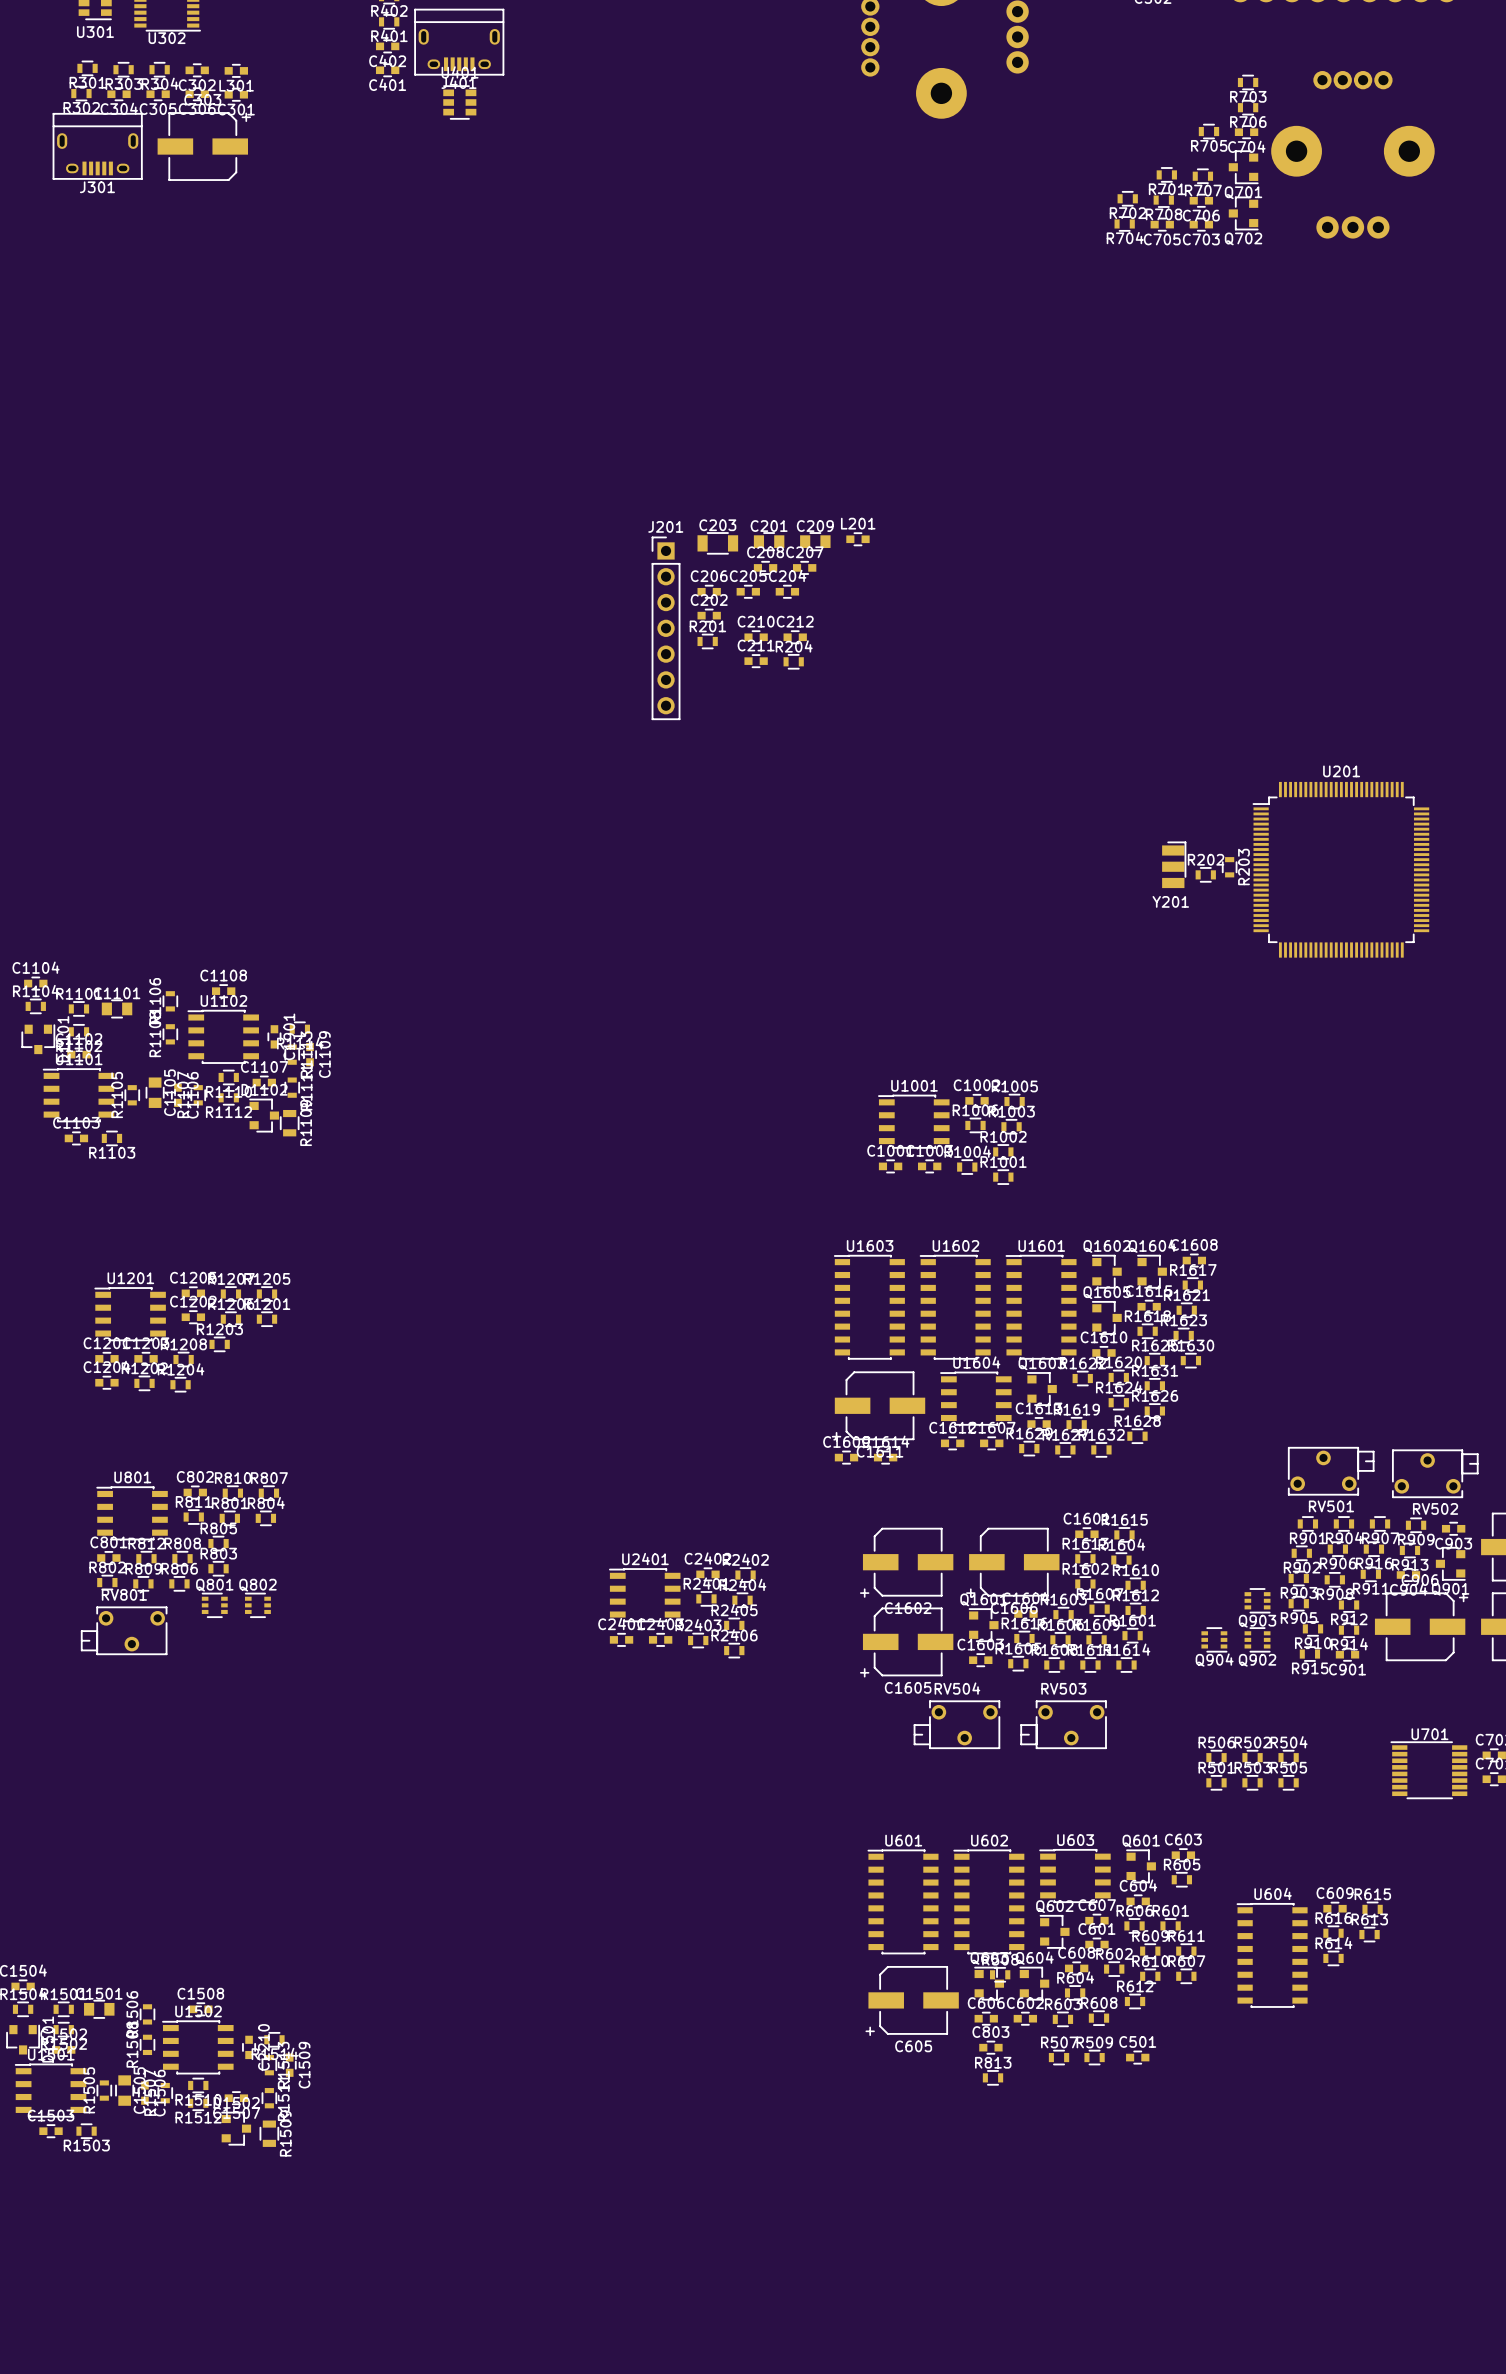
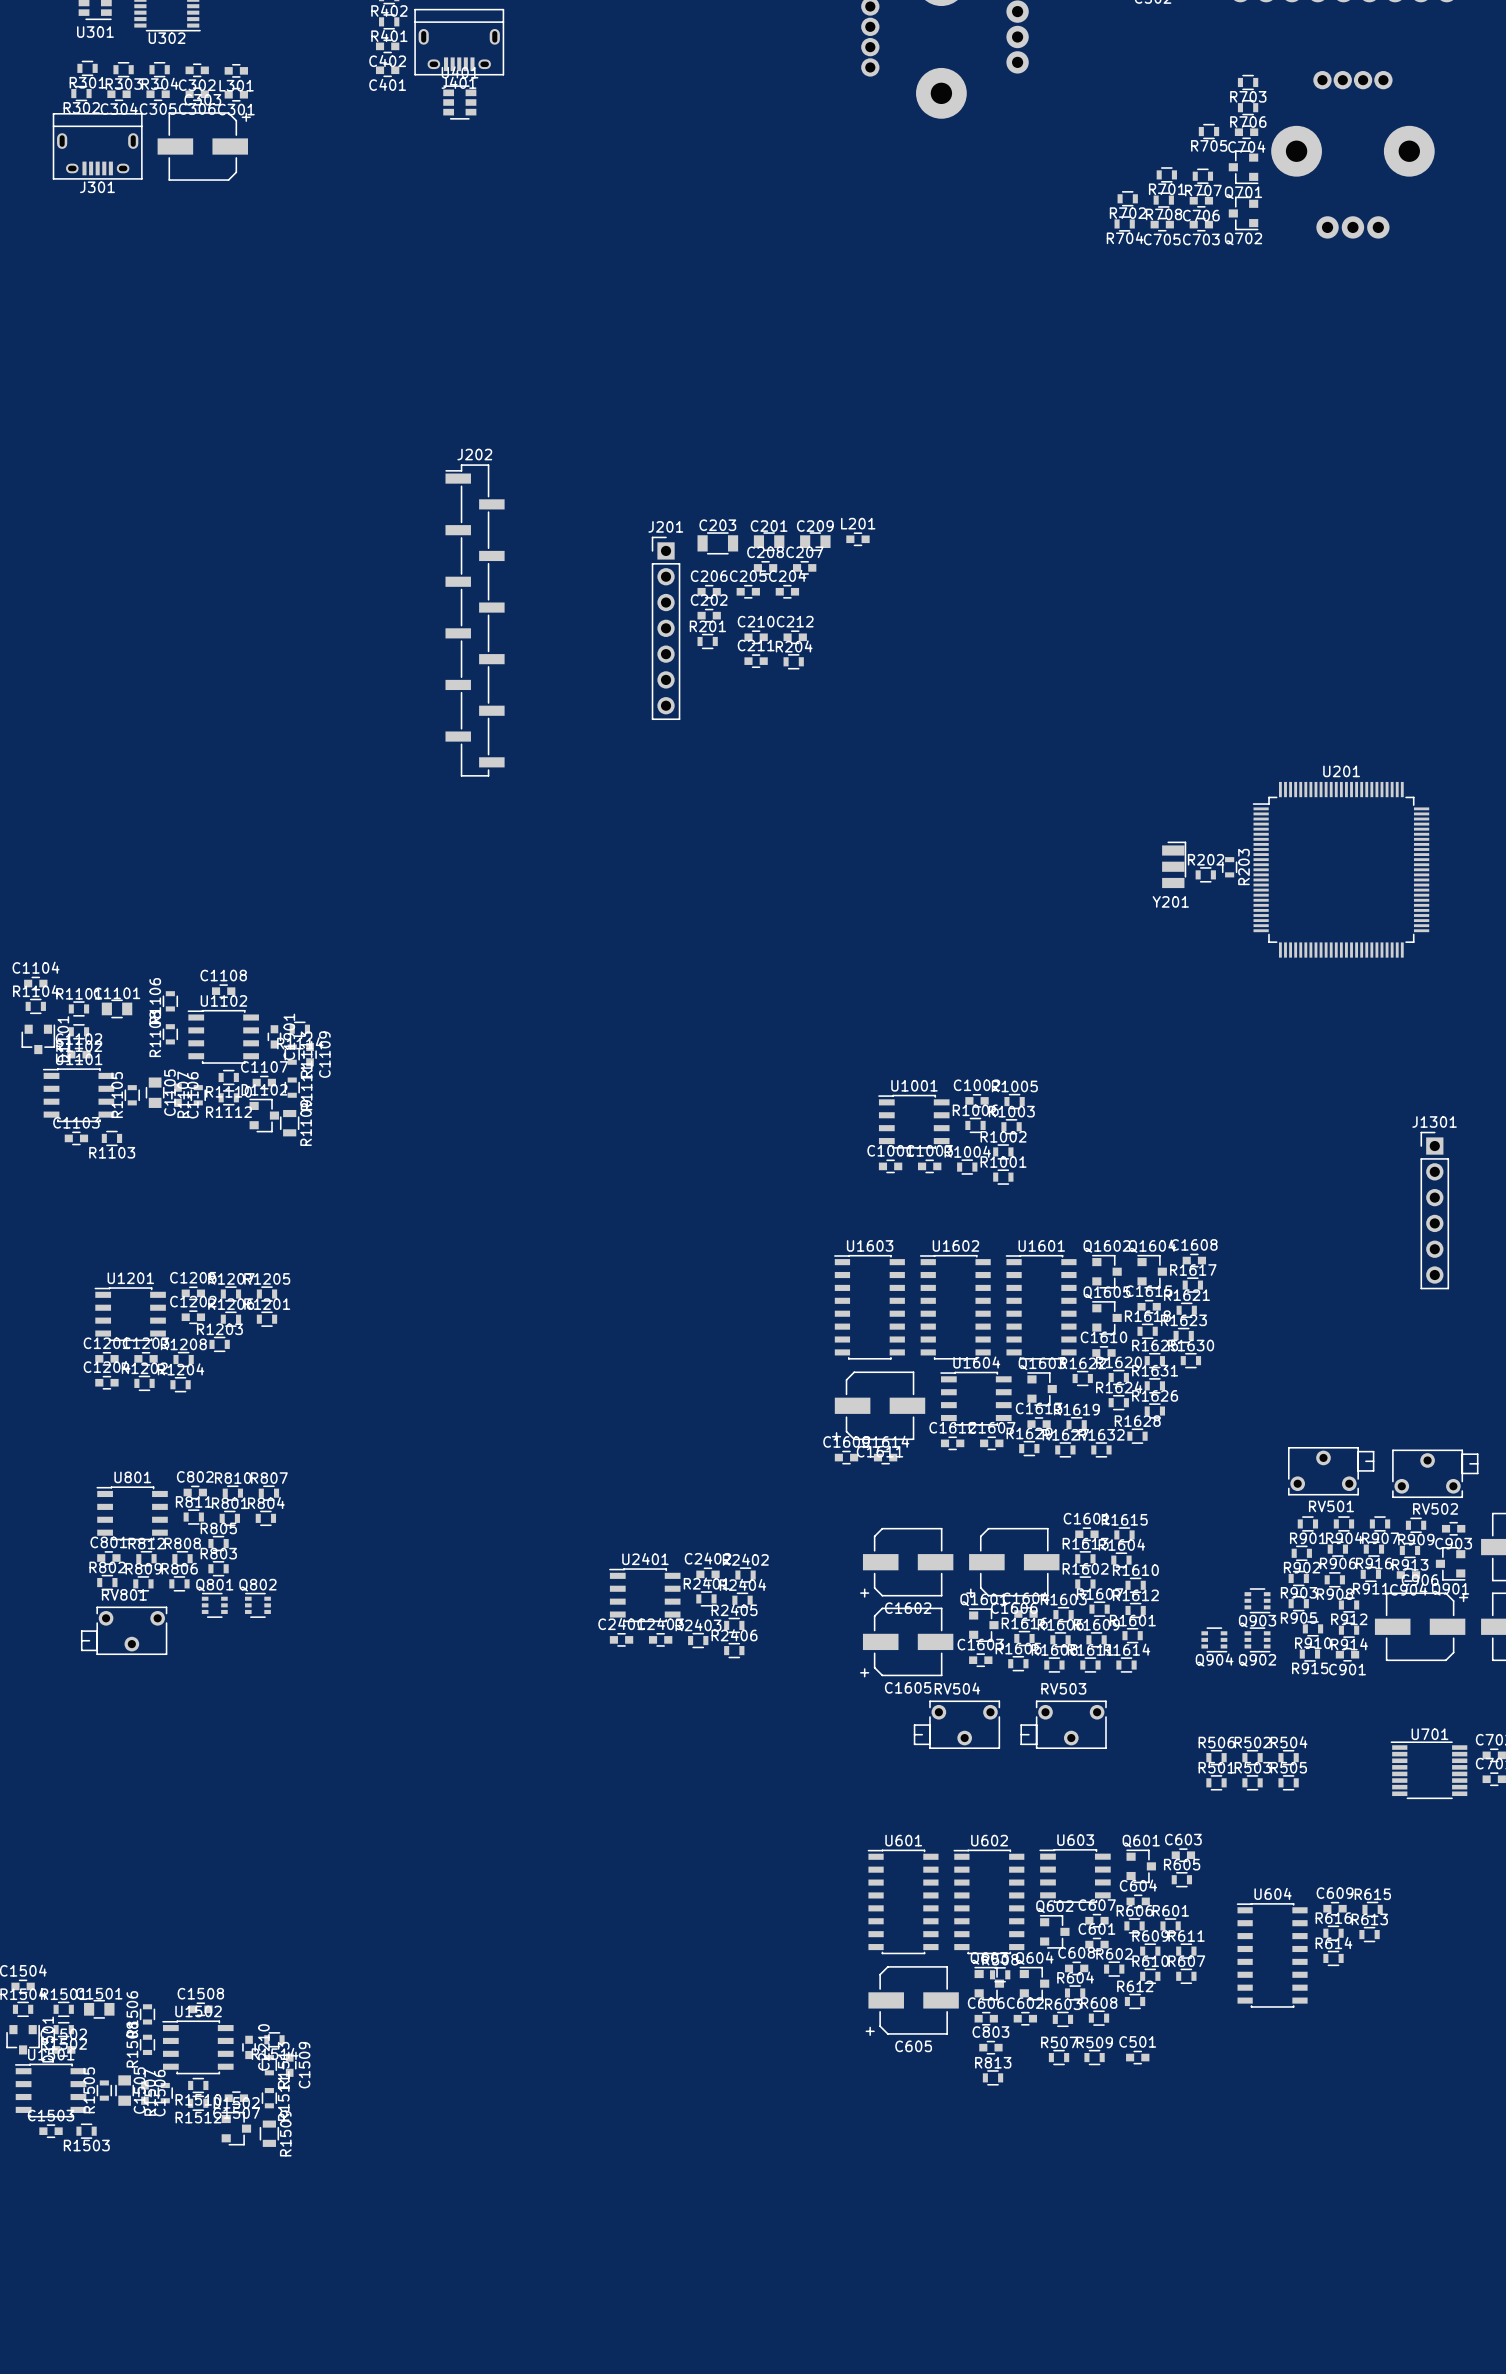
J202: none -> (475, 620)
J1301: none -> (1434, 1210)

